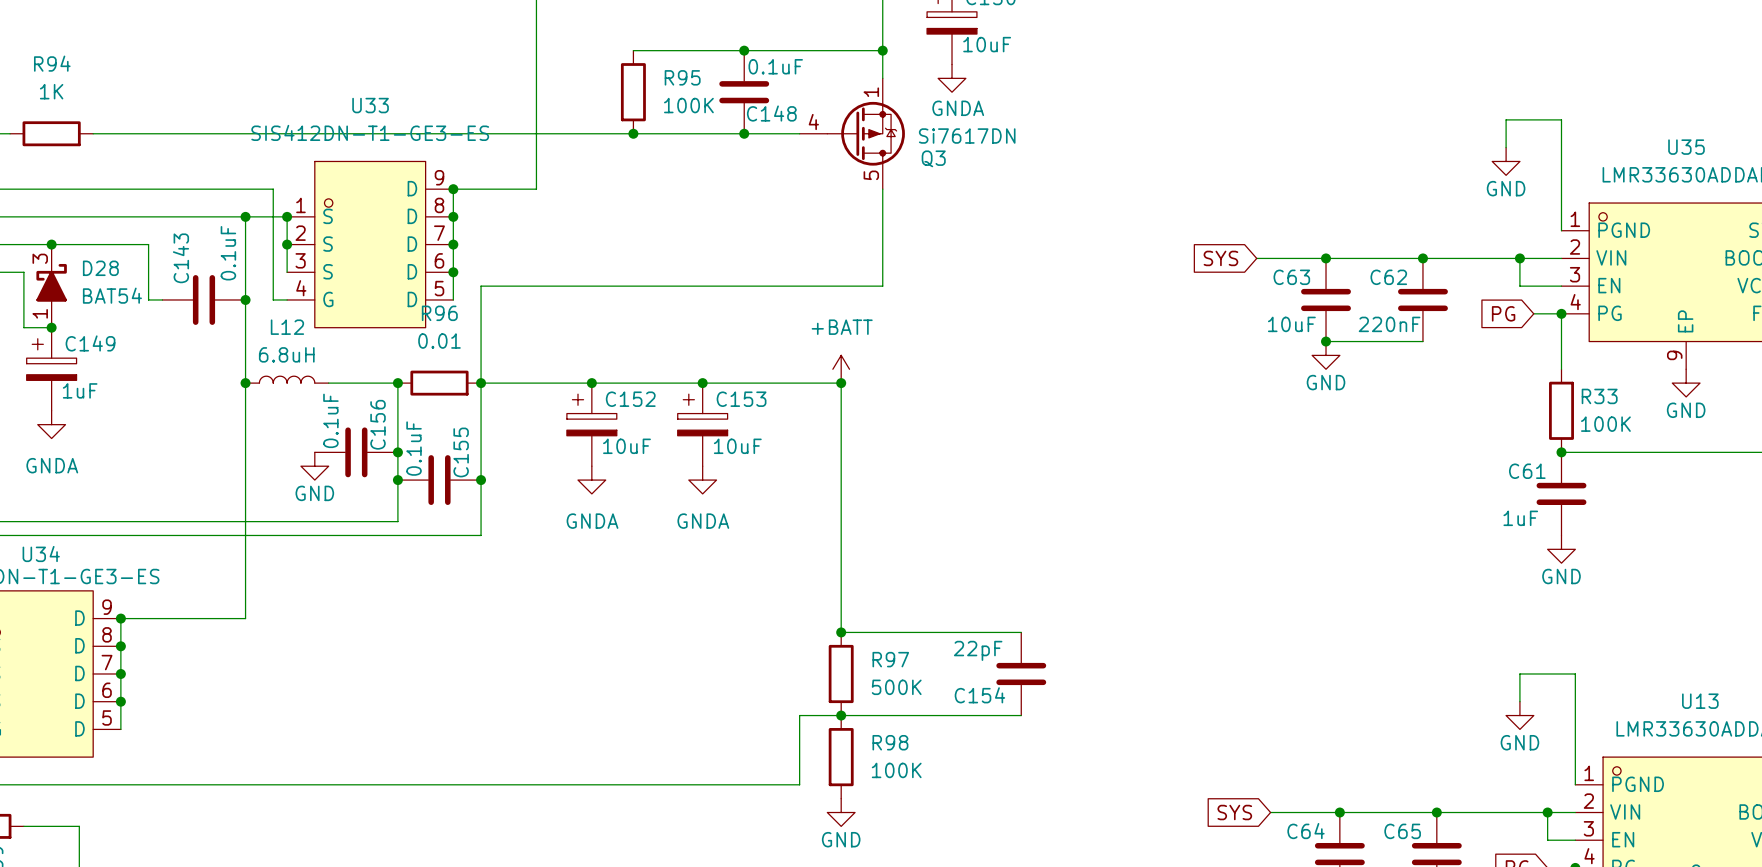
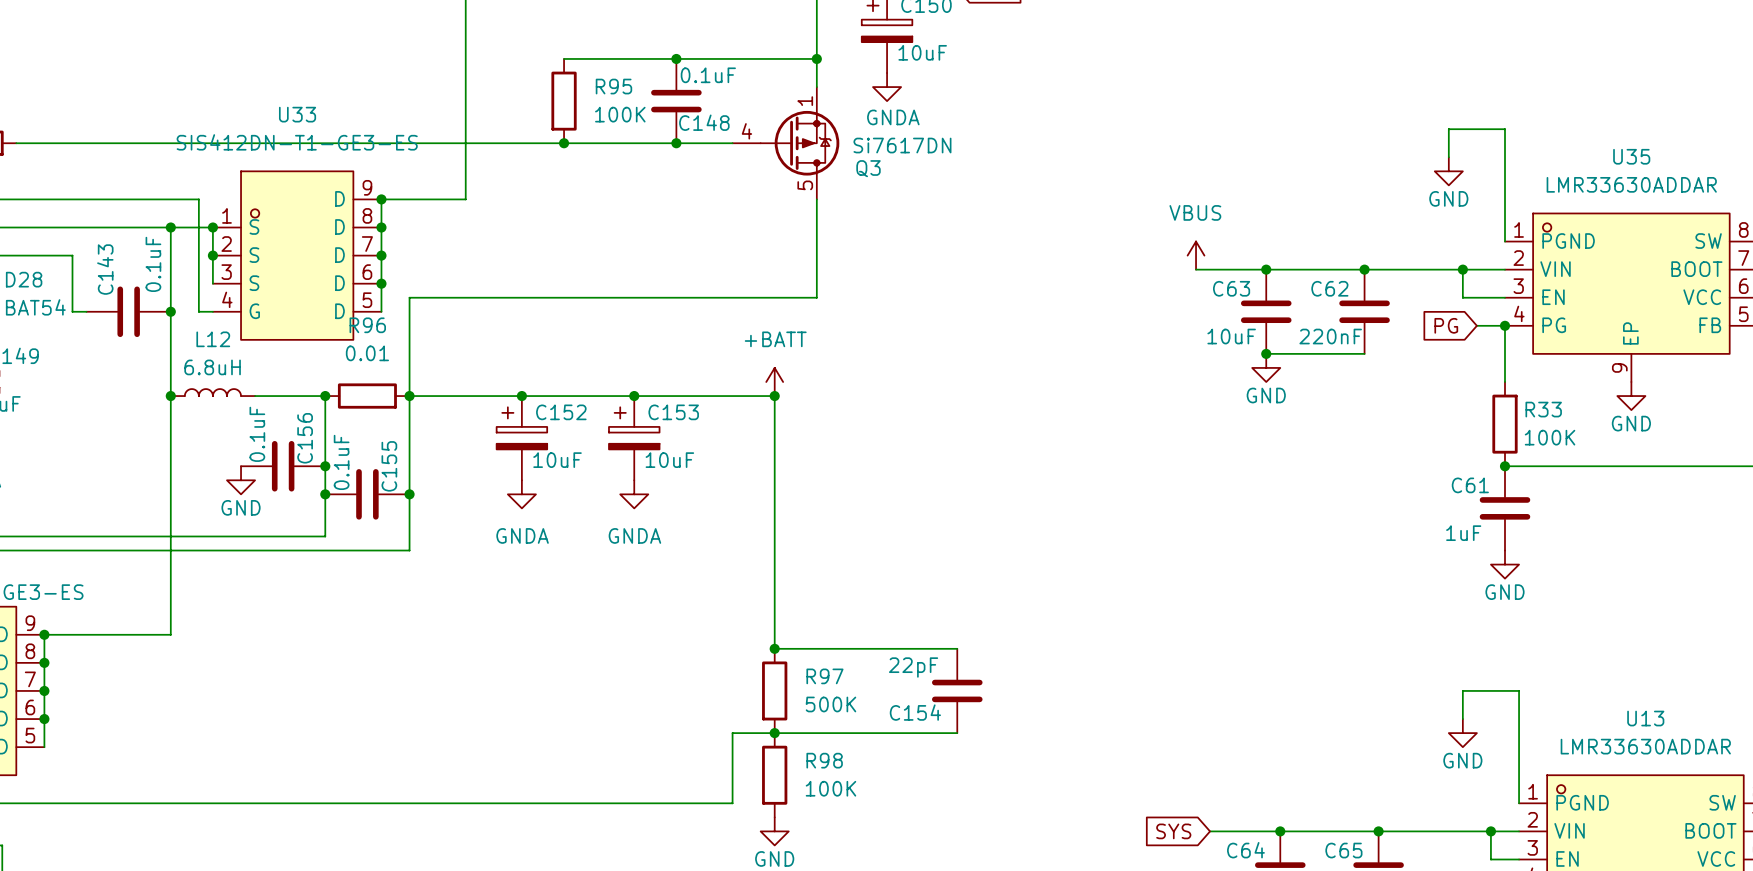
power symbol: none -> VBUS (1196, 255)
global label: SYS (1220, 258) -> none

